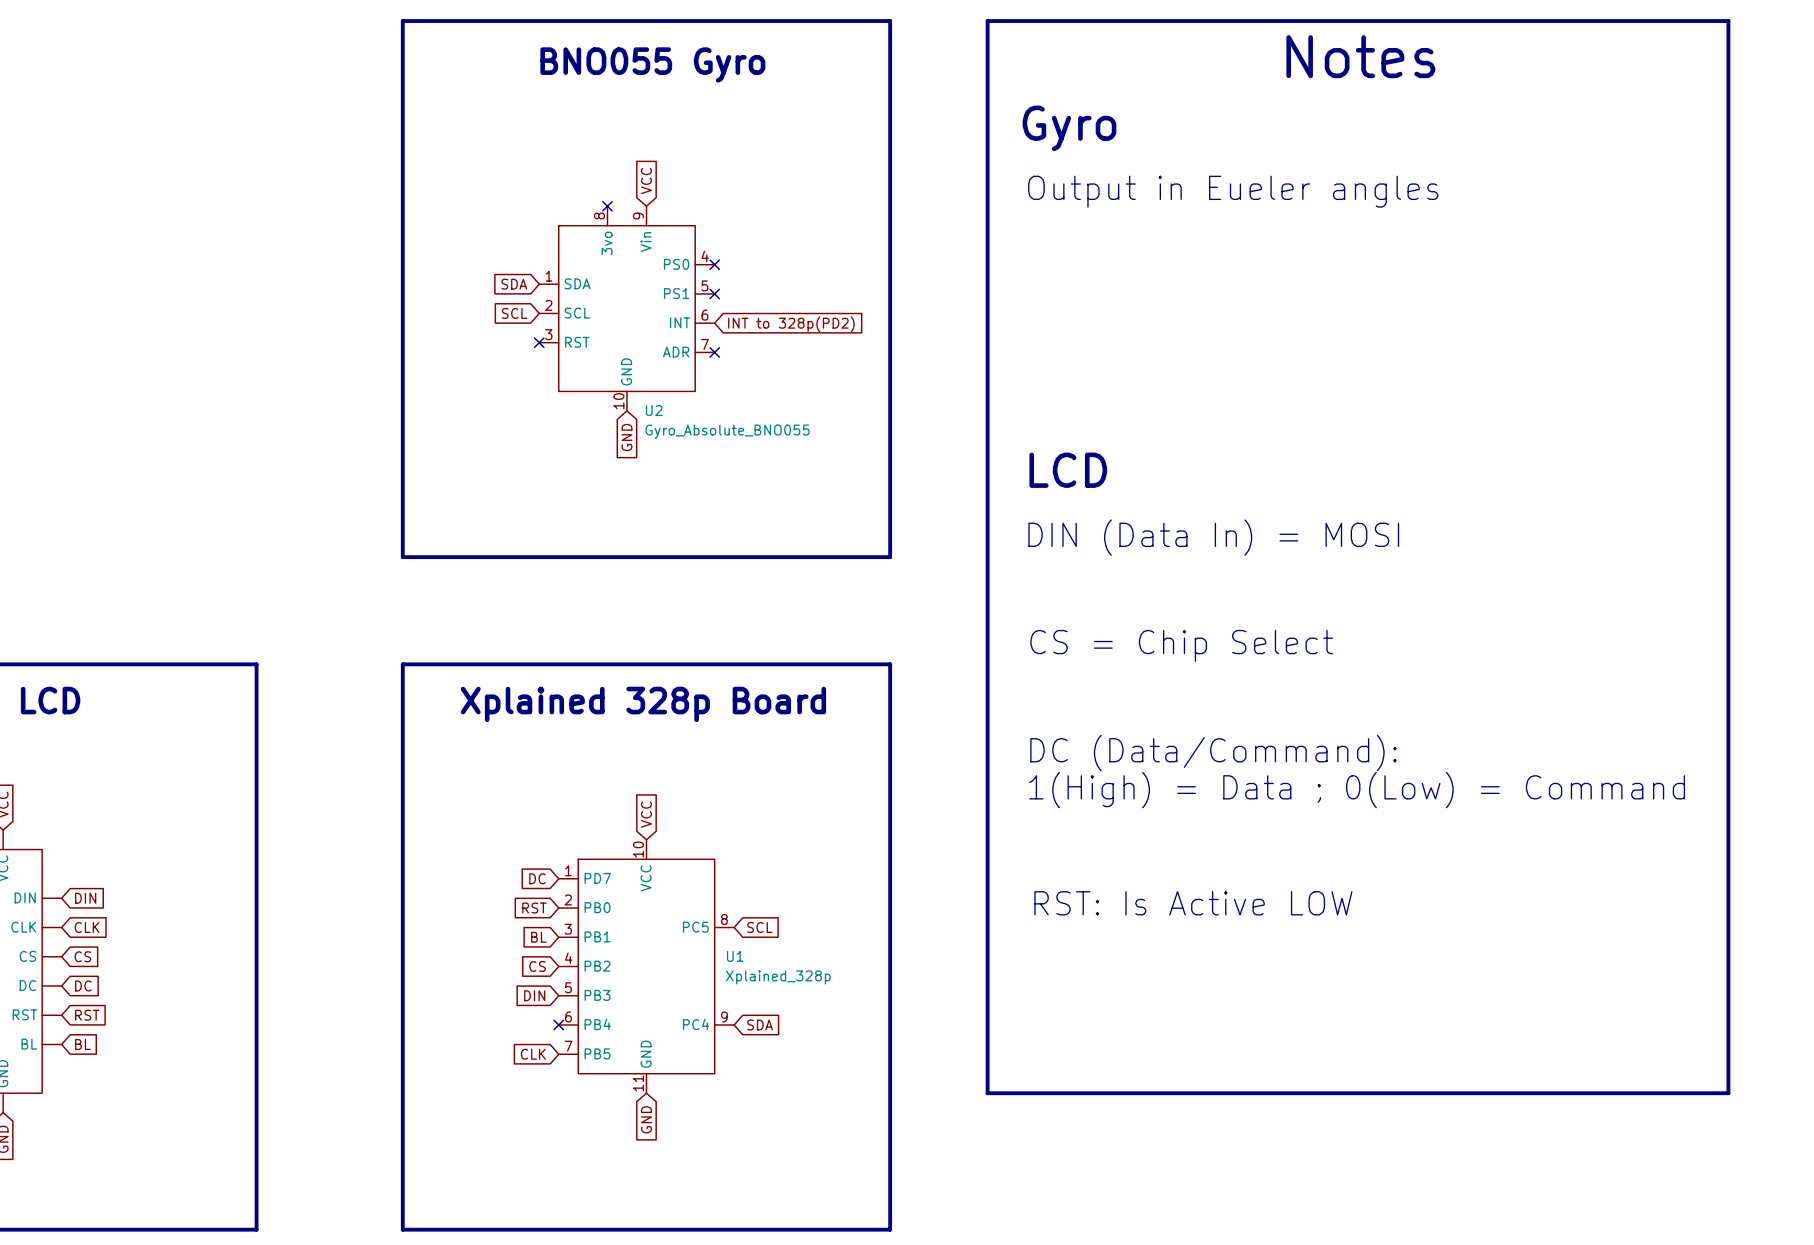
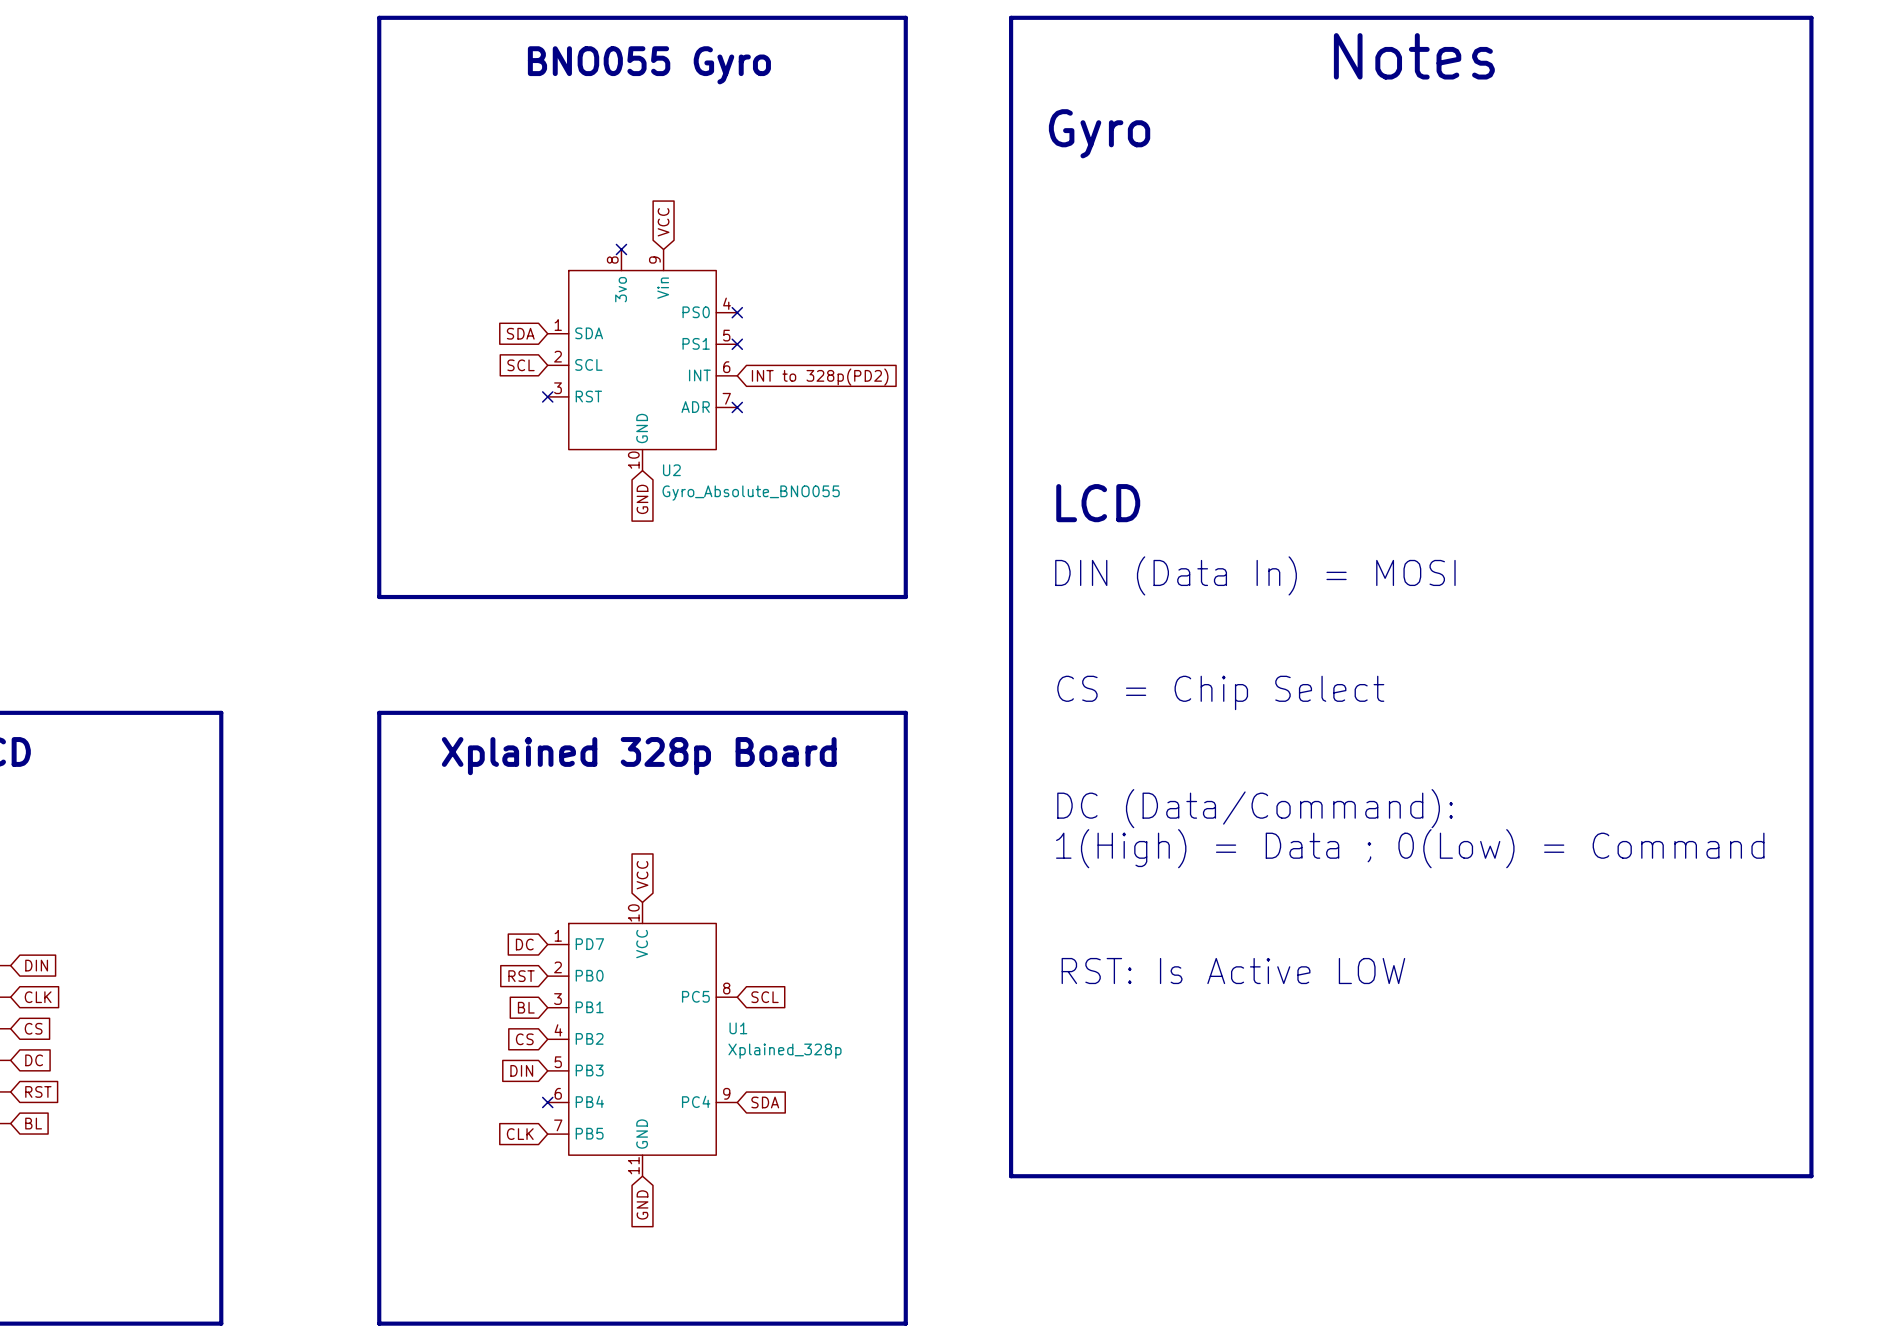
global label position: VCC (646, 181) -> VCC (663, 222)
text: Output in Eueler angles (1233, 191) -> none
no-connect mark position: (607, 206) -> (621, 249)
no-connect mark: (714, 264) -> none
global label position: SDA (514, 284) -> SDA (520, 333)
no-connect mark: (714, 293) -> none
no-connect mark: none -> (737, 312)
U2 position: (626, 308) -> (642, 360)
global label position: SCL (514, 313) -> SCL (521, 365)
no-connect mark: none -> (737, 344)
global label position: INT to 328p(PD2) (791, 324) -> INT to 328p(PD2) (820, 377)
no-connect mark position: (539, 342) -> (547, 396)
no-connect mark: (714, 352) -> none
no-connect mark: none -> (737, 407)
global label position: GND (626, 437) -> GND (642, 499)

